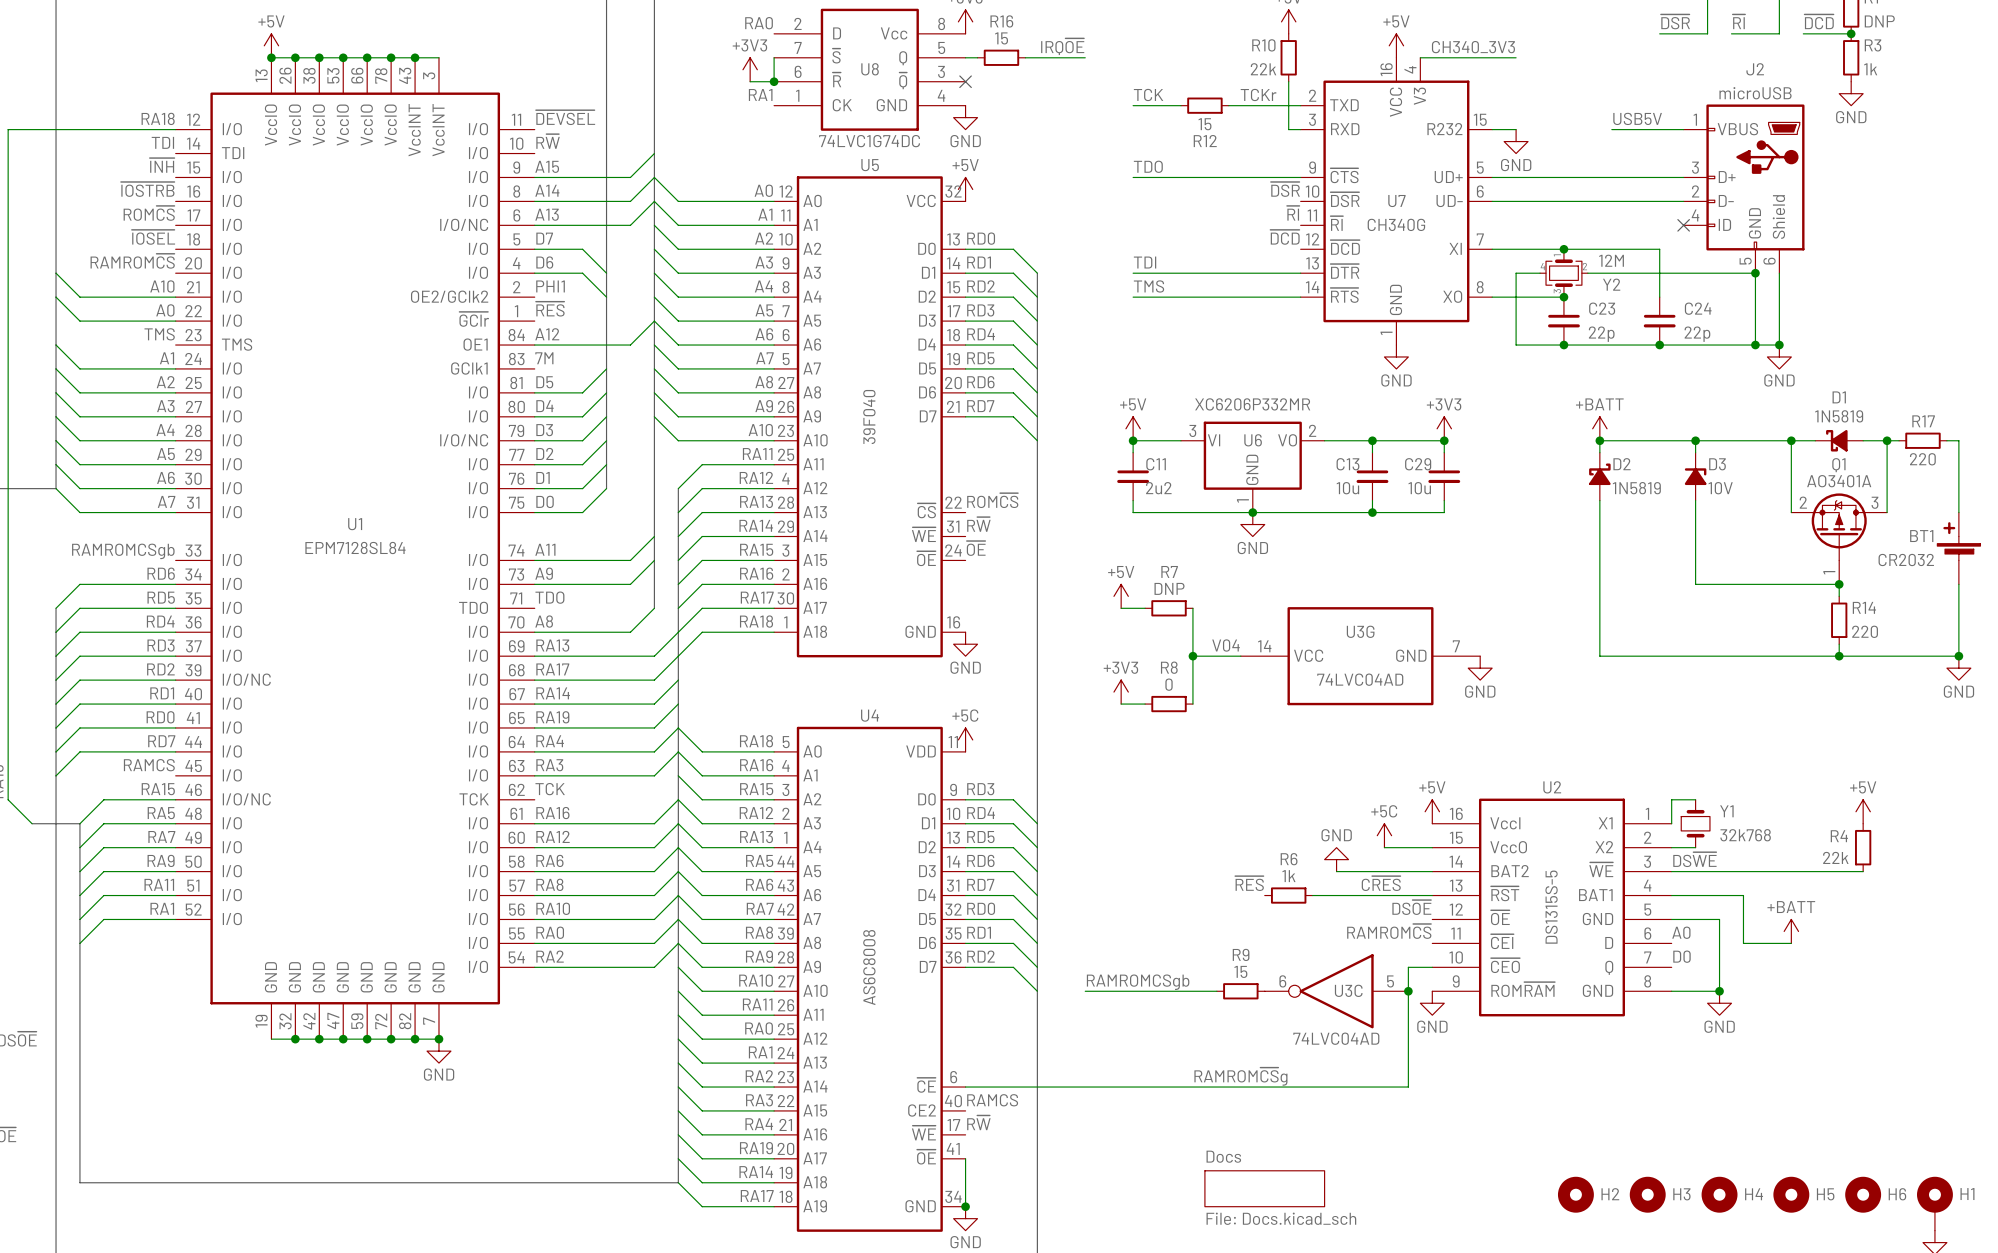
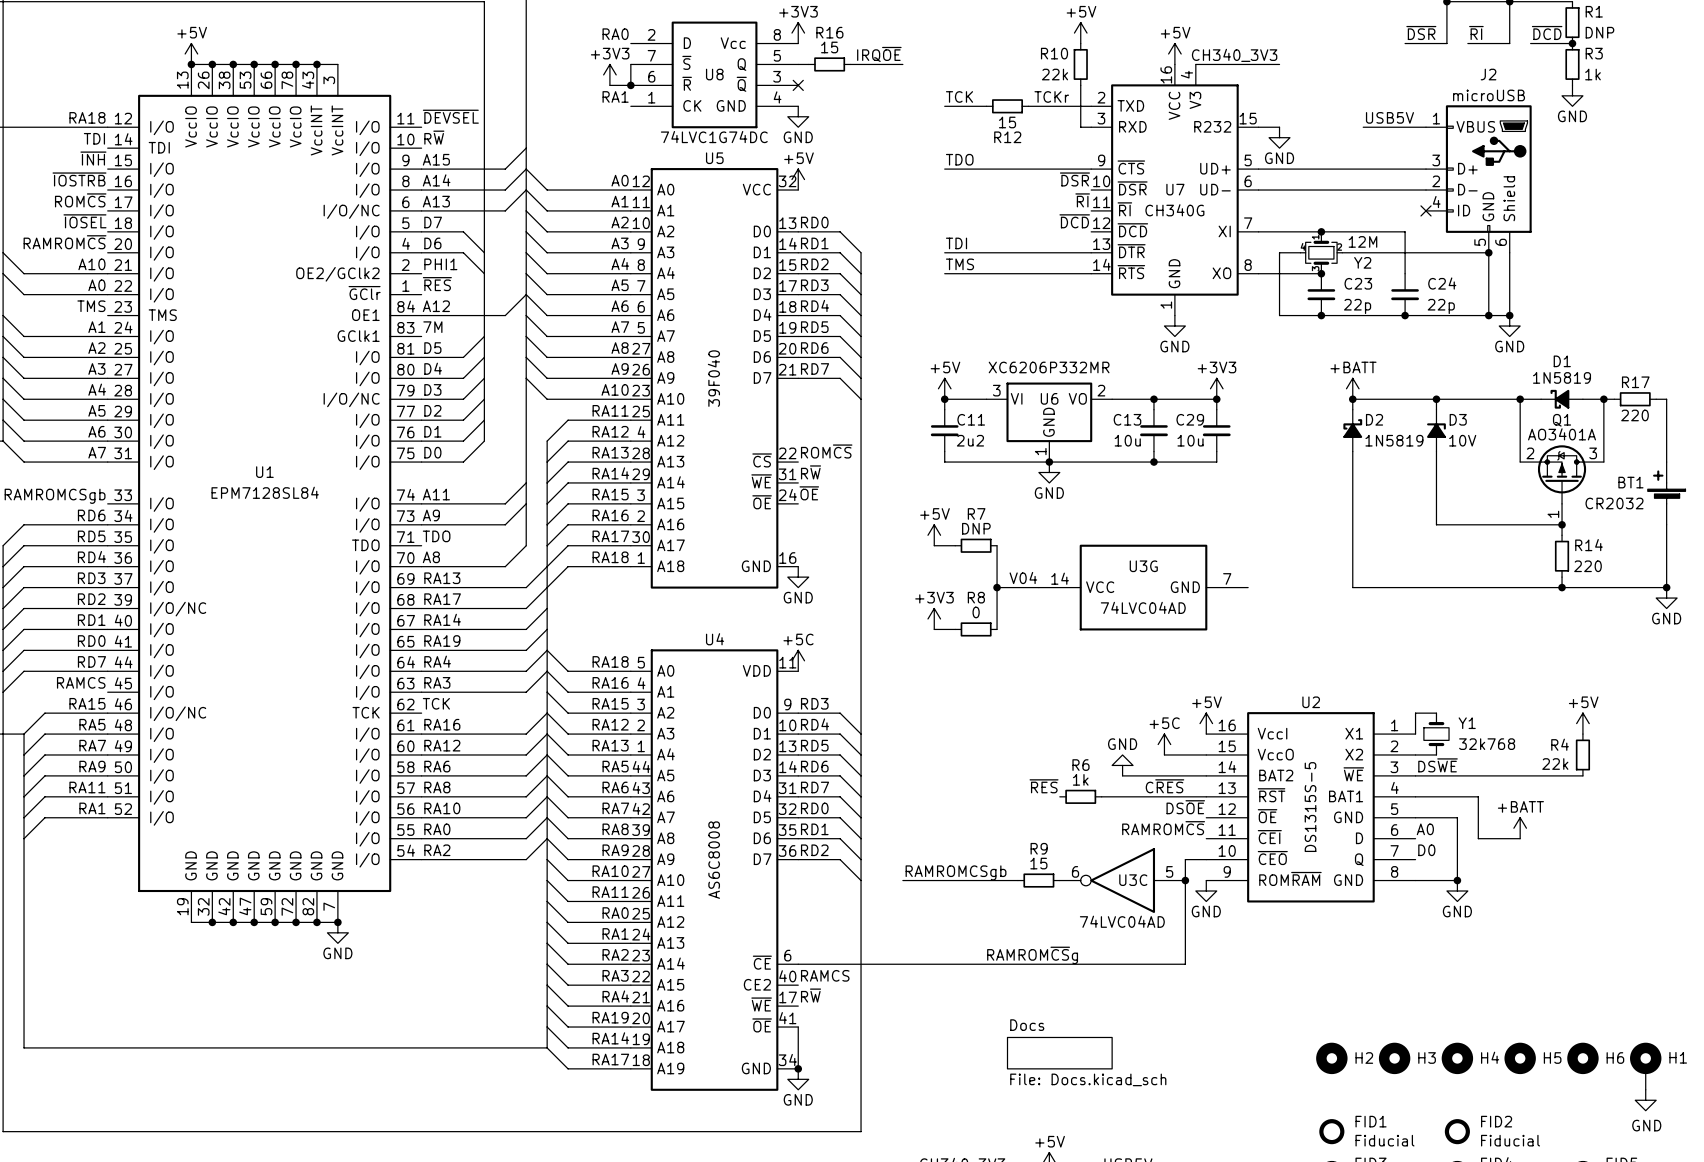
power symbol: GND (1480, 668) -> none

